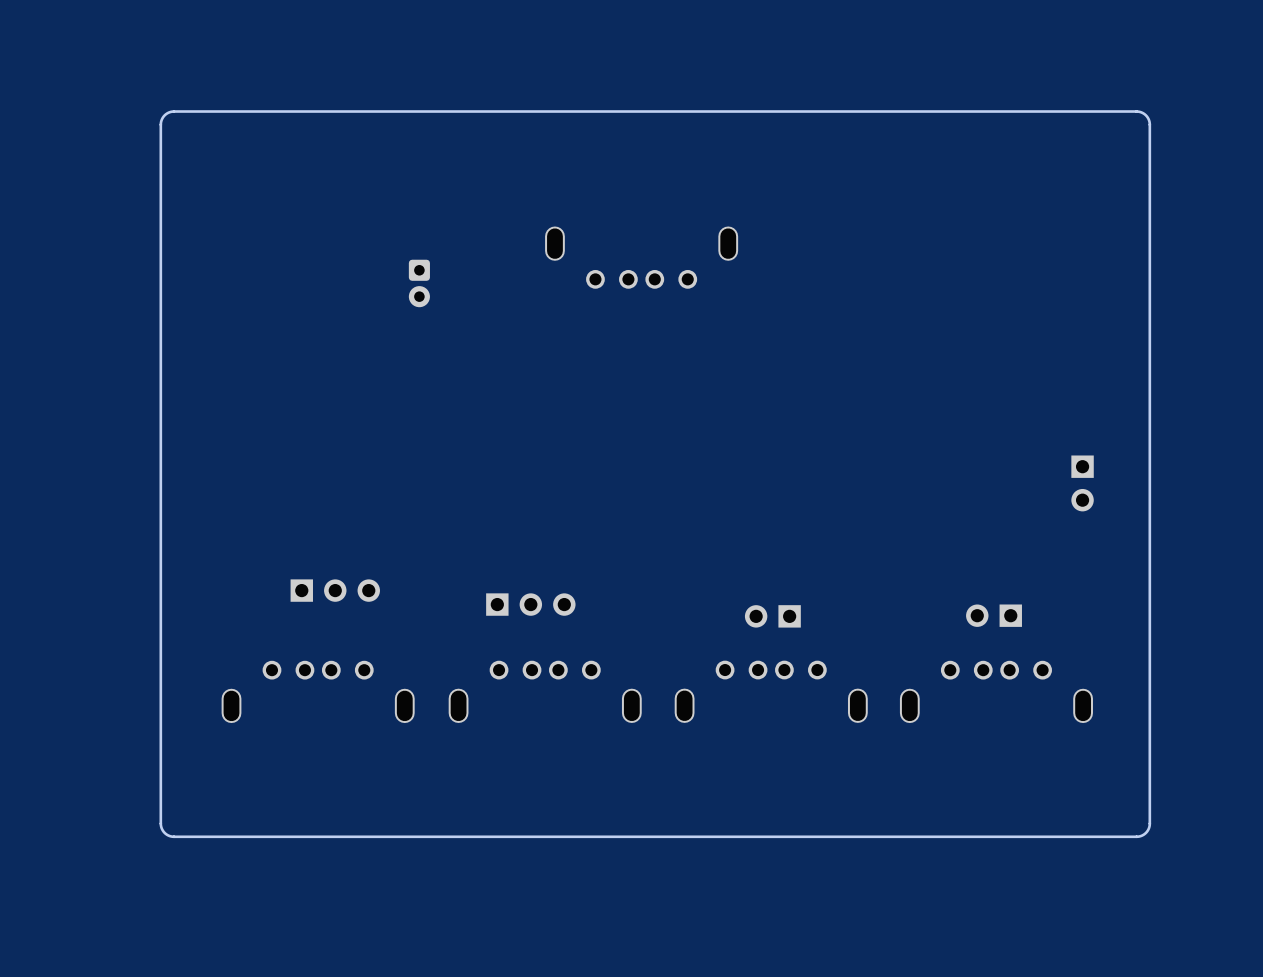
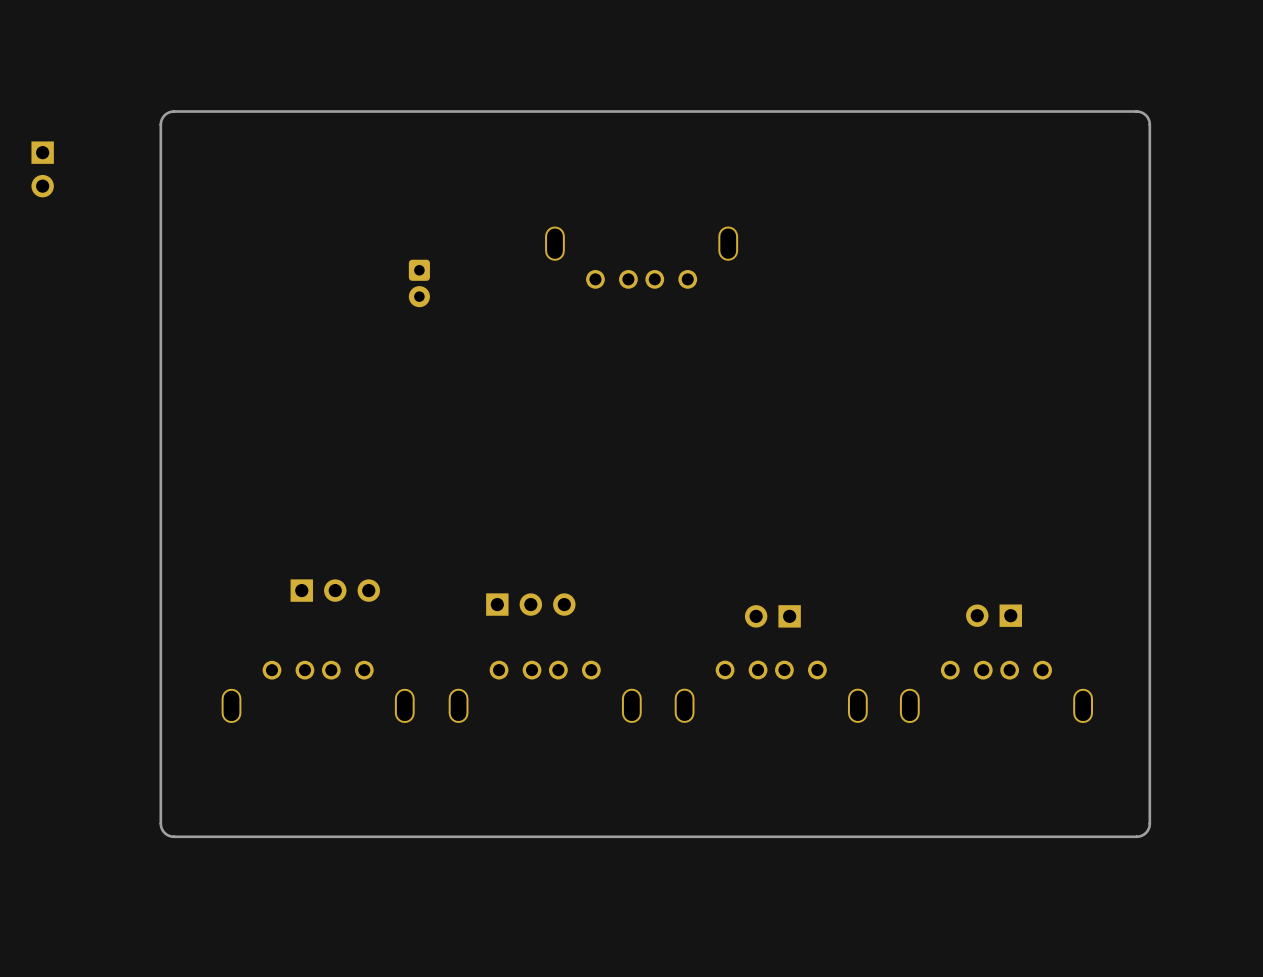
part: none -> (42, 169)
part: (1082, 483) -> none

